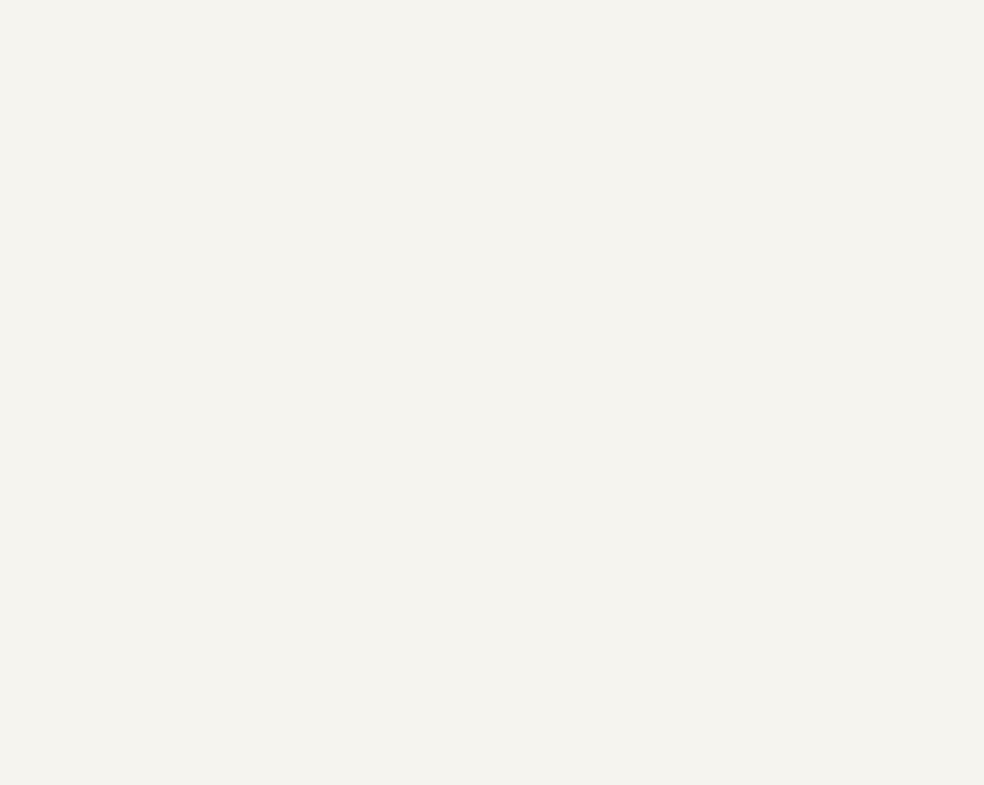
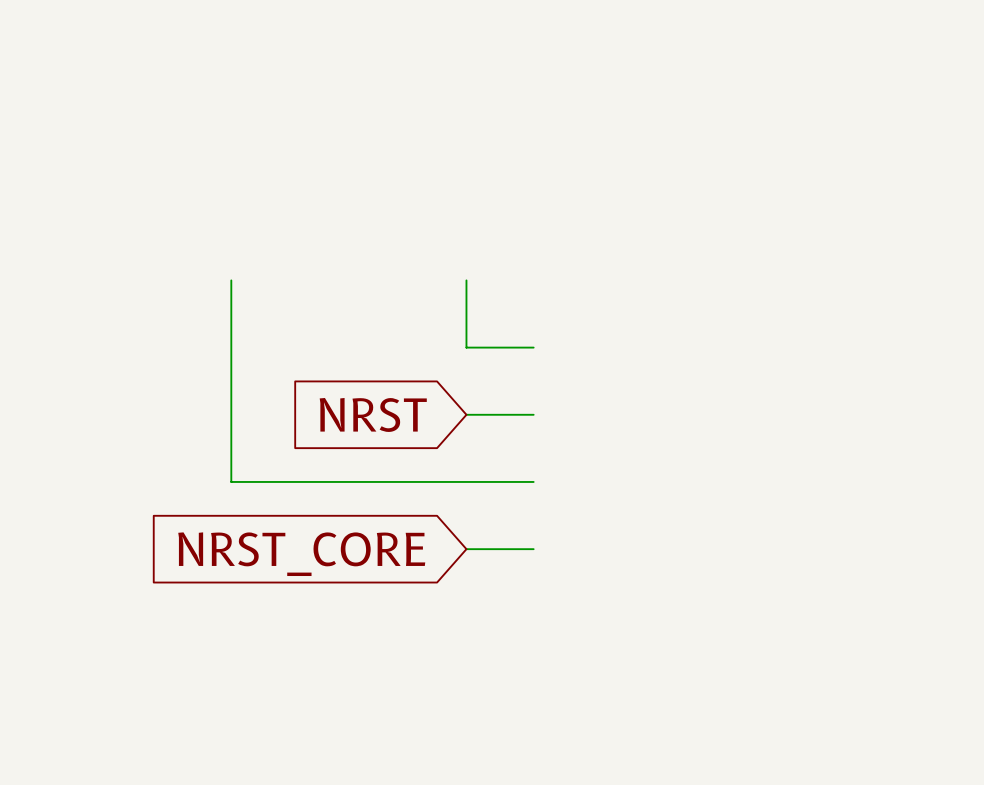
wire: none -> (231, 280) (231, 481) (533, 481)
wire: none -> (466, 280) (466, 347) (533, 347)
global label: none -> NRST (373, 414)
wire: none -> (466, 414) (533, 414)
wire: none -> (466, 549) (533, 549)
global label: none -> NRST_CORE (301, 554)

